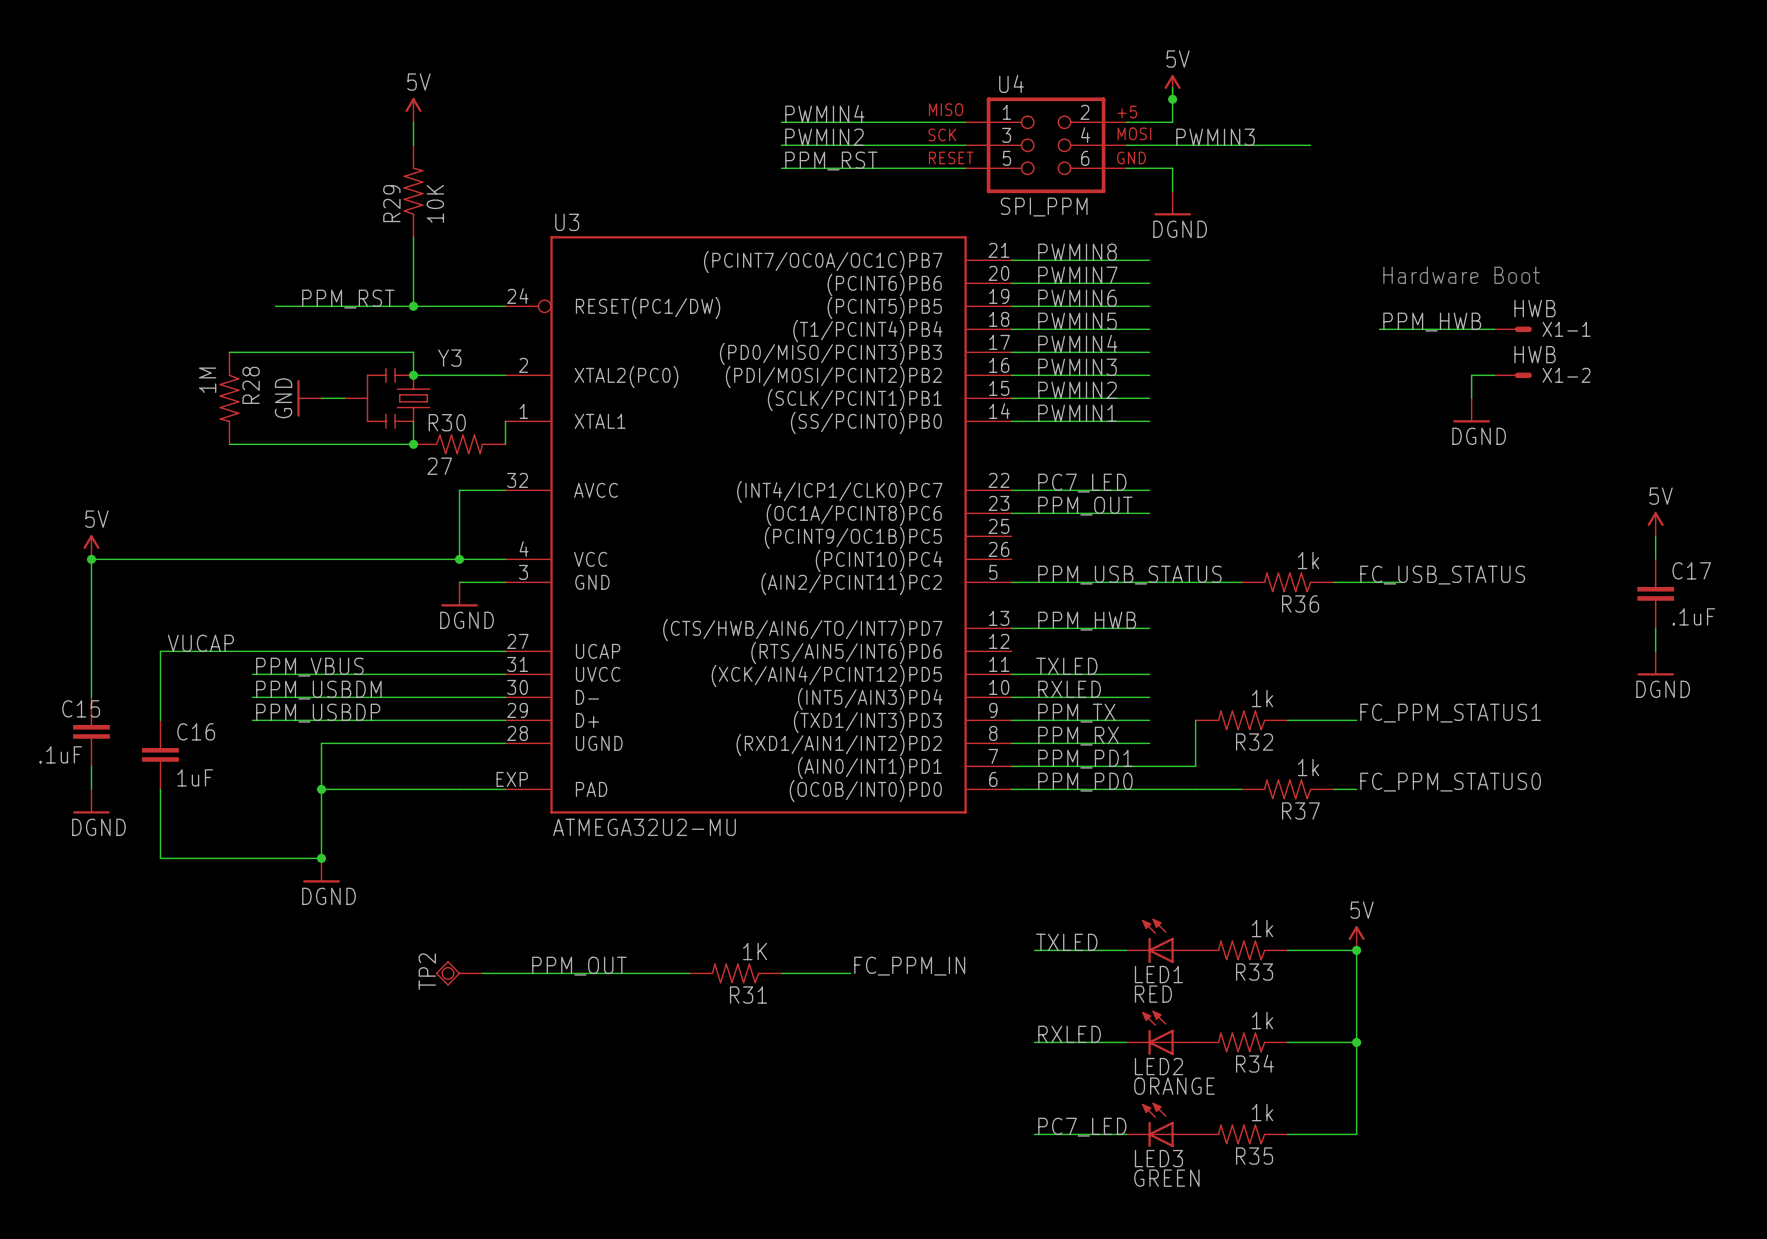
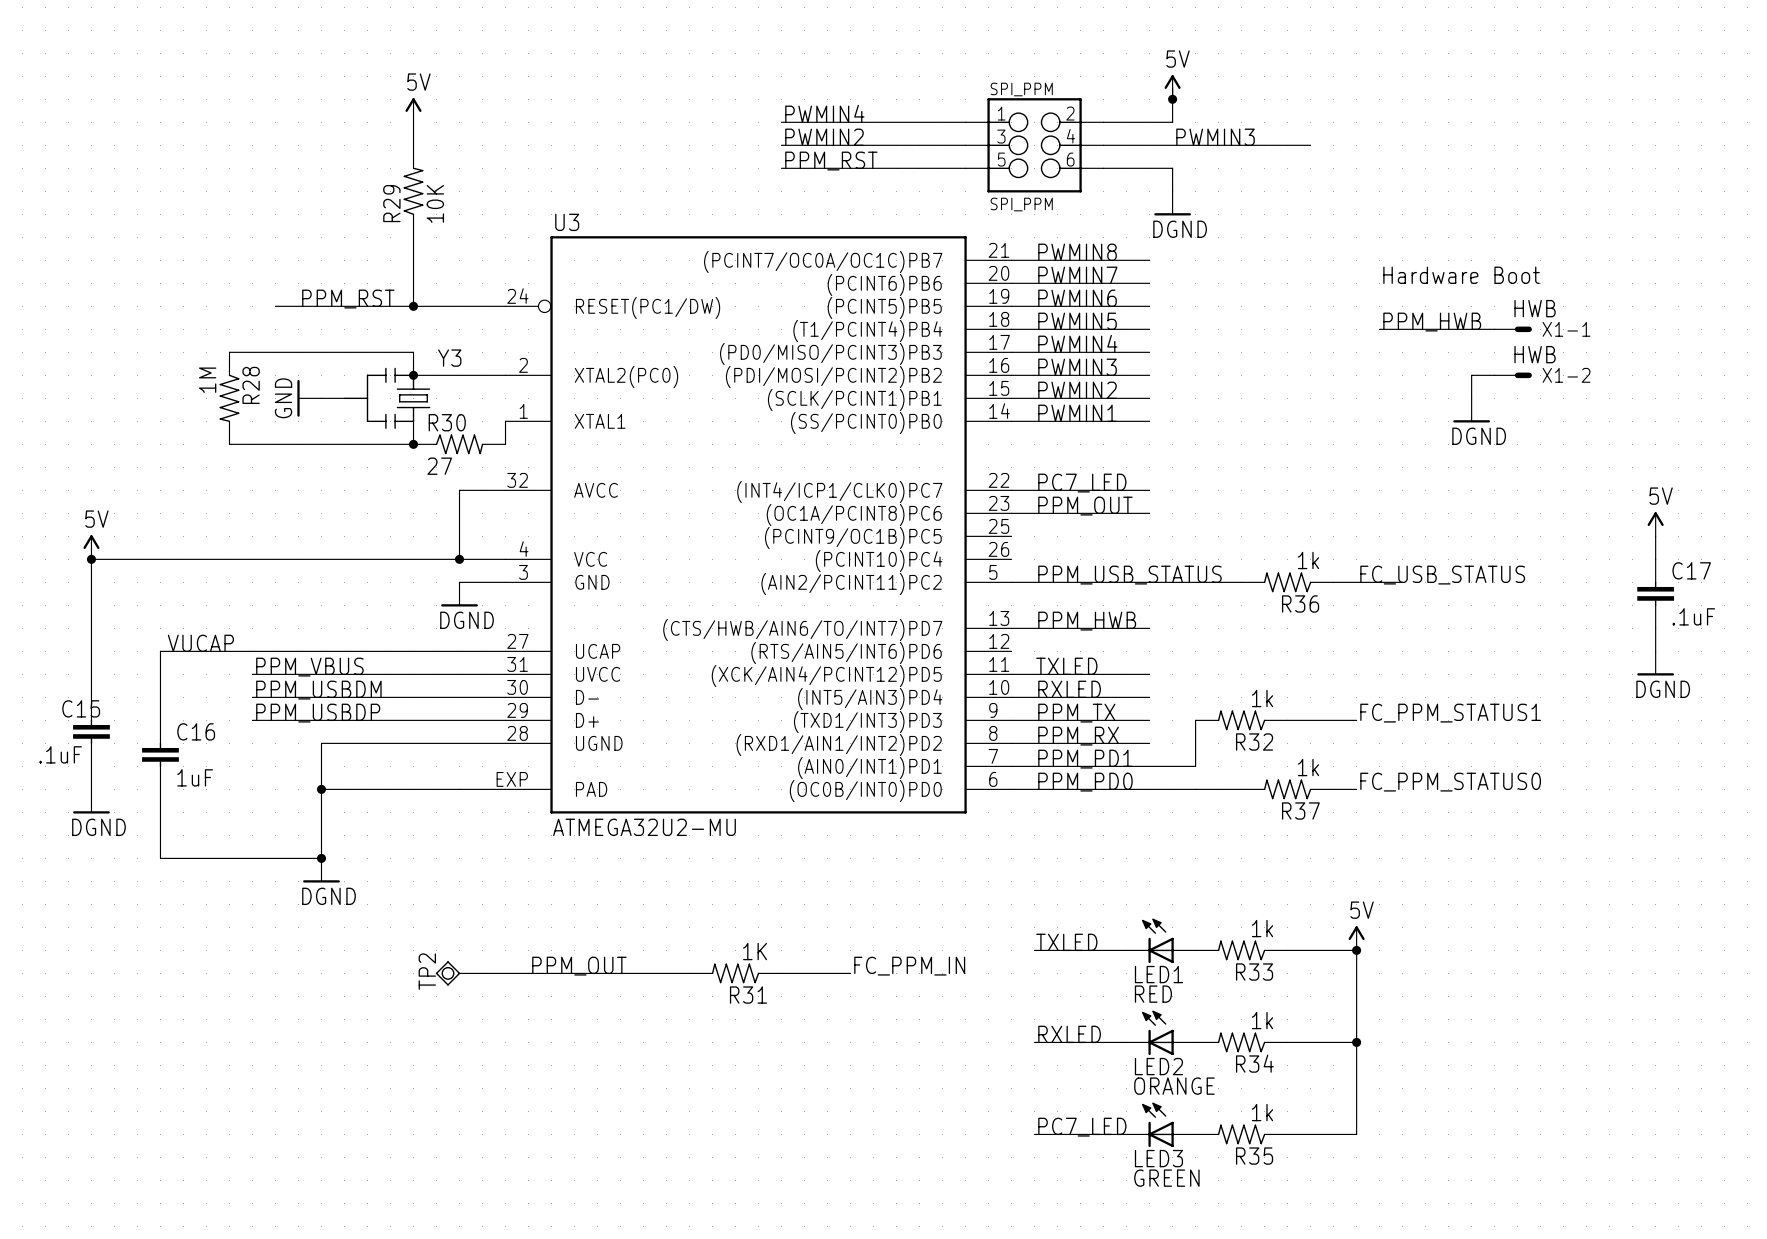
SPI_PPM: none -> SPI_PPM (1034, 145)
U4: SPI_PPM (1046, 145) -> none

